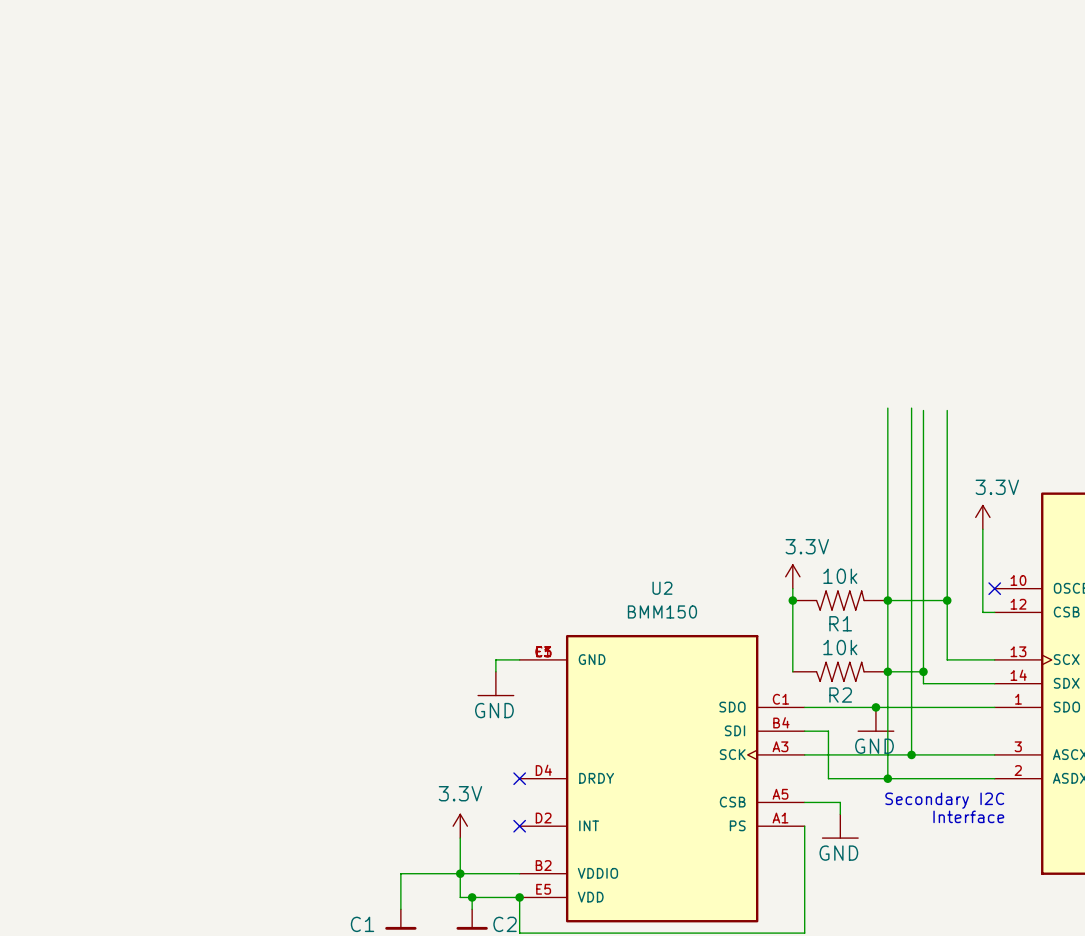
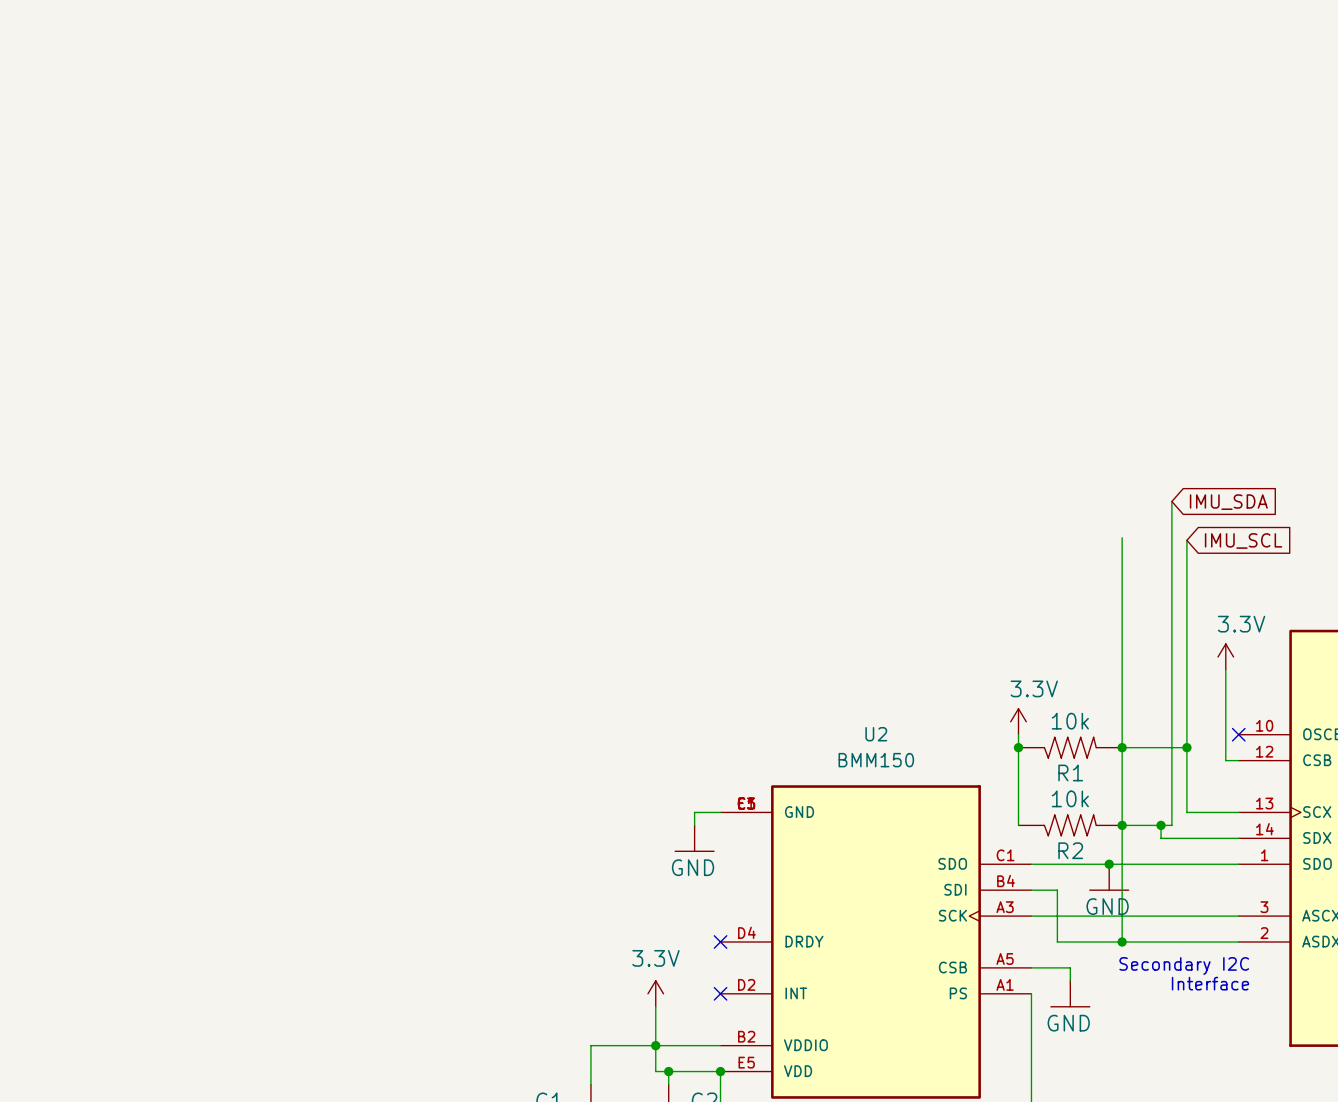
global label: none -> IMU_SDA (1228, 502)
wire: (911, 408) (911, 754) -> none
wire: (923, 410) (923, 671) -> (1171, 501) (1171, 825) (1161, 825)
global label: none -> IMU_SCL (1243, 540)
junction: (911, 754) -> none

